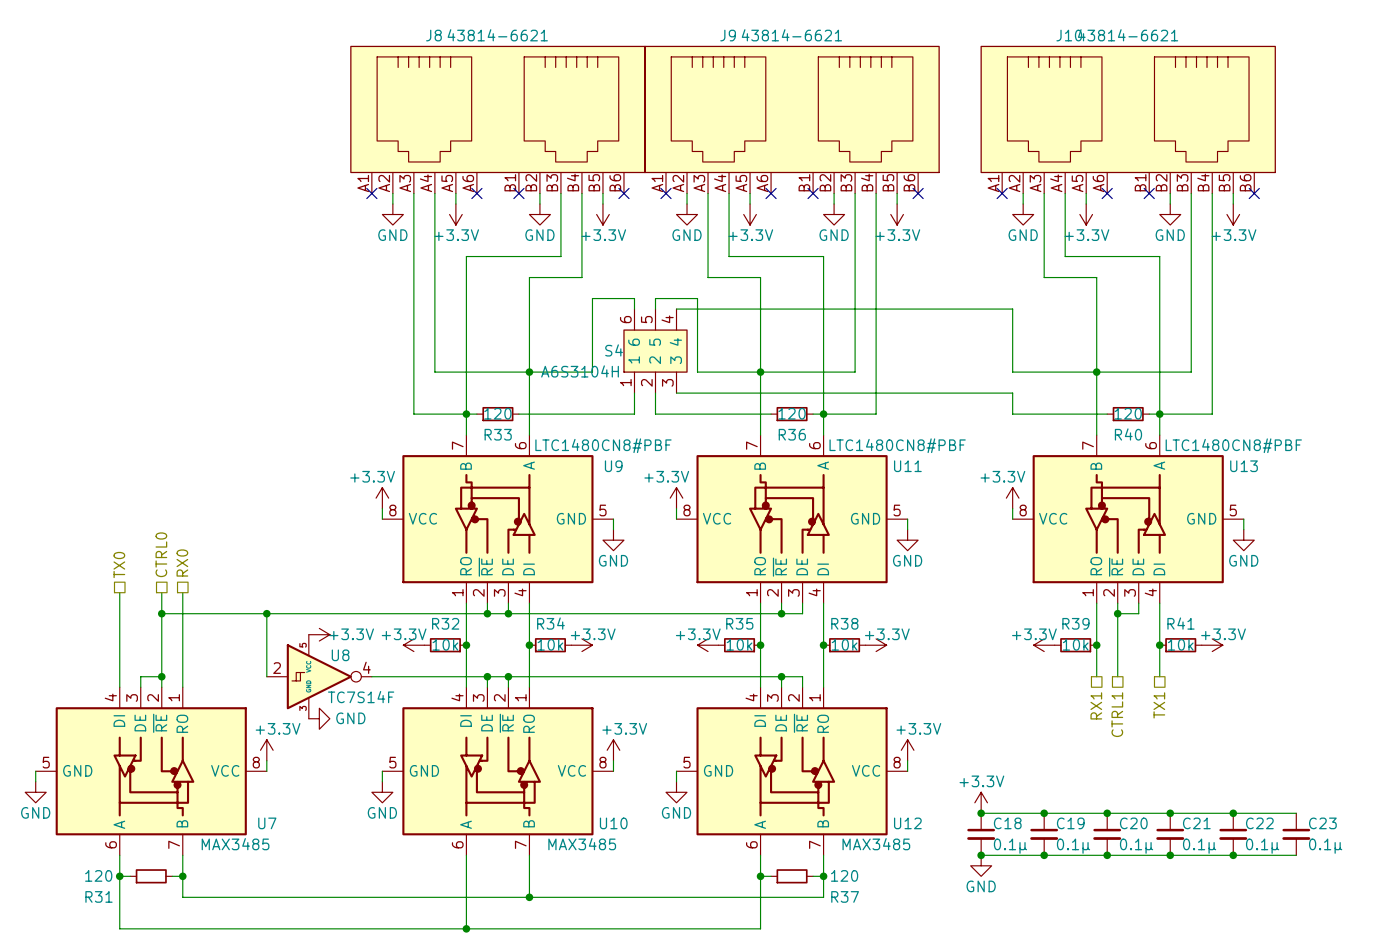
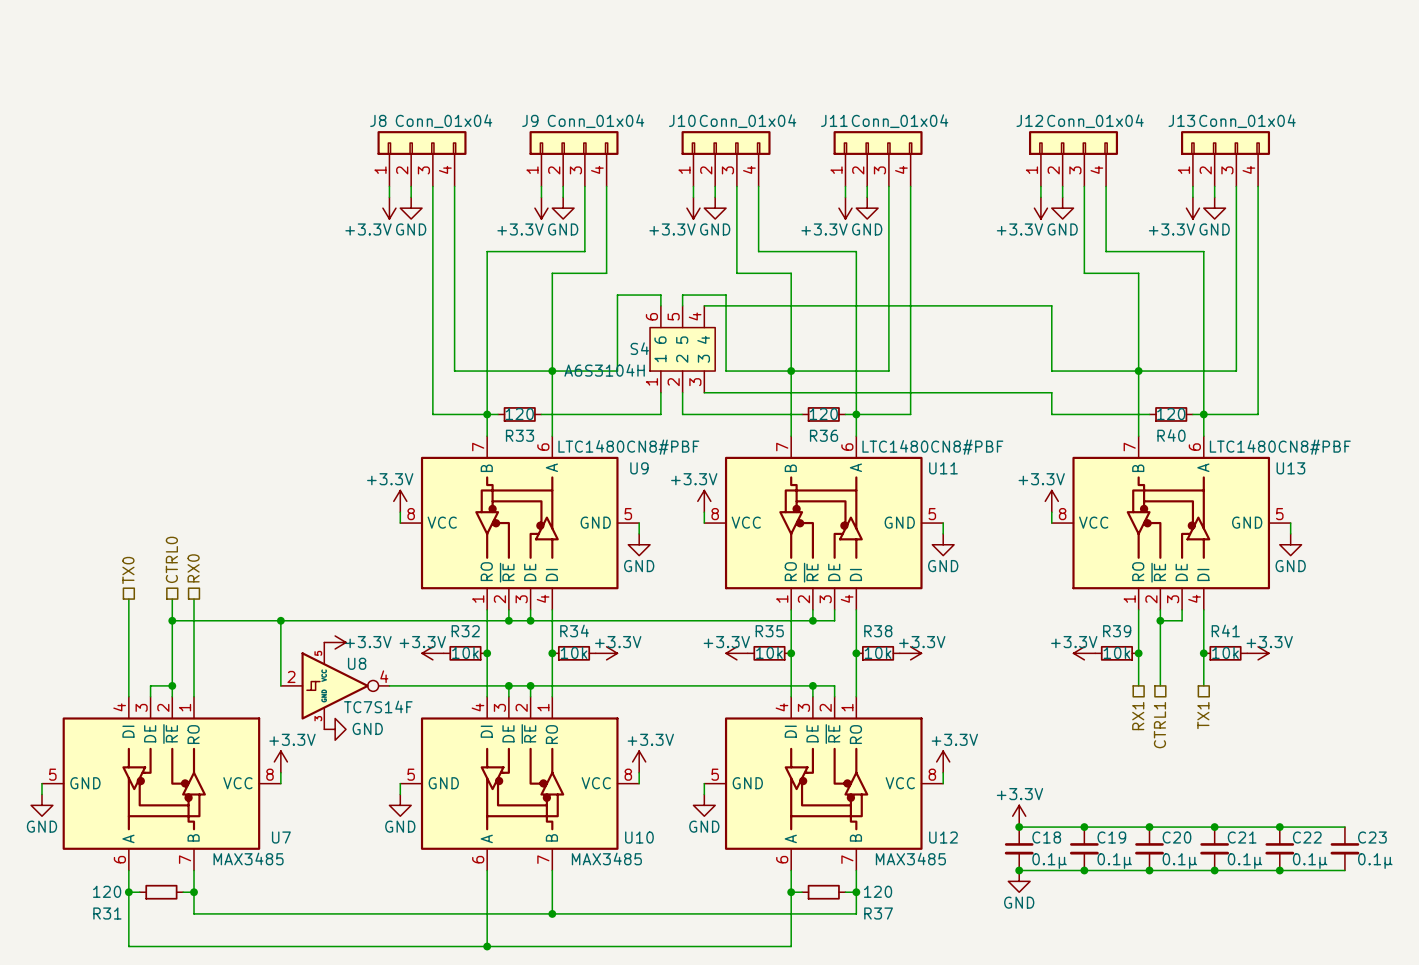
J8 name position: J8 (433, 35) -> J8 (378, 120)
J8 value: 43814-6621 (497, 35) -> Conn_01x04 (443, 121)
J9 name position: J9 (728, 35) -> J9 (530, 120)
J9 value: 43814-6621 (791, 35) -> Conn_01x04 (596, 121)
J10 name position: J10 (1069, 35) -> J10 (682, 120)
J10 value: 43814-6621 (1128, 35) -> Conn_01x04 (748, 121)
J8 symbol: [350, 45, 646, 194] -> [377, 131, 467, 187]
J9 symbol: [644, 45, 940, 194] -> [529, 131, 619, 187]
J10 symbol: [980, 45, 1276, 194] -> [681, 131, 771, 187]
J11: none -> Conn_01x04 (878, 158)
J12: none -> Conn_01x04 (1073, 158)
J13: none -> Conn_01x04 (1225, 158)
no-connect mark: (371, 193) -> none
wire: (455, 193) (455, 204) -> (389, 186) (389, 197)
no-connect mark: (476, 193) -> none
no-connect mark: (518, 193) -> none
wire: (602, 193) (602, 204) -> (541, 186) (541, 197)
no-connect mark: (623, 193) -> none
no-connect mark: (666, 193) -> none
wire: (750, 193) (750, 204) -> (693, 186) (693, 197)
no-connect mark: (771, 193) -> none
no-connect mark: (813, 193) -> none
wire: (897, 193) (897, 204) -> (845, 186) (845, 197)
no-connect mark: (918, 193) -> none
no-connect mark: (1002, 193) -> none
wire: (1086, 193) (1086, 204) -> (1040, 186) (1040, 197)
no-connect mark: (1107, 193) -> none
no-connect mark: (1149, 193) -> none
wire: (1233, 193) (1233, 204) -> (1192, 186) (1192, 197)
no-connect mark: (1254, 193) -> none
power symbol: none -> +3.3V (389, 208)
power symbol: +3.3V (455, 214) -> none
power symbol: none -> +3.3V (541, 208)
power symbol: +3.3V (602, 214) -> none
power symbol: none -> +3.3V (693, 208)
power symbol: +3.3V (750, 214) -> none
power symbol: none -> +3.3V (845, 208)
power symbol: +3.3V (897, 214) -> none
power symbol: none -> +3.3V (1040, 208)
power symbol: +3.3V (1086, 214) -> none
power symbol: none -> +3.3V (1192, 208)
power symbol: +3.3V (1233, 214) -> none

